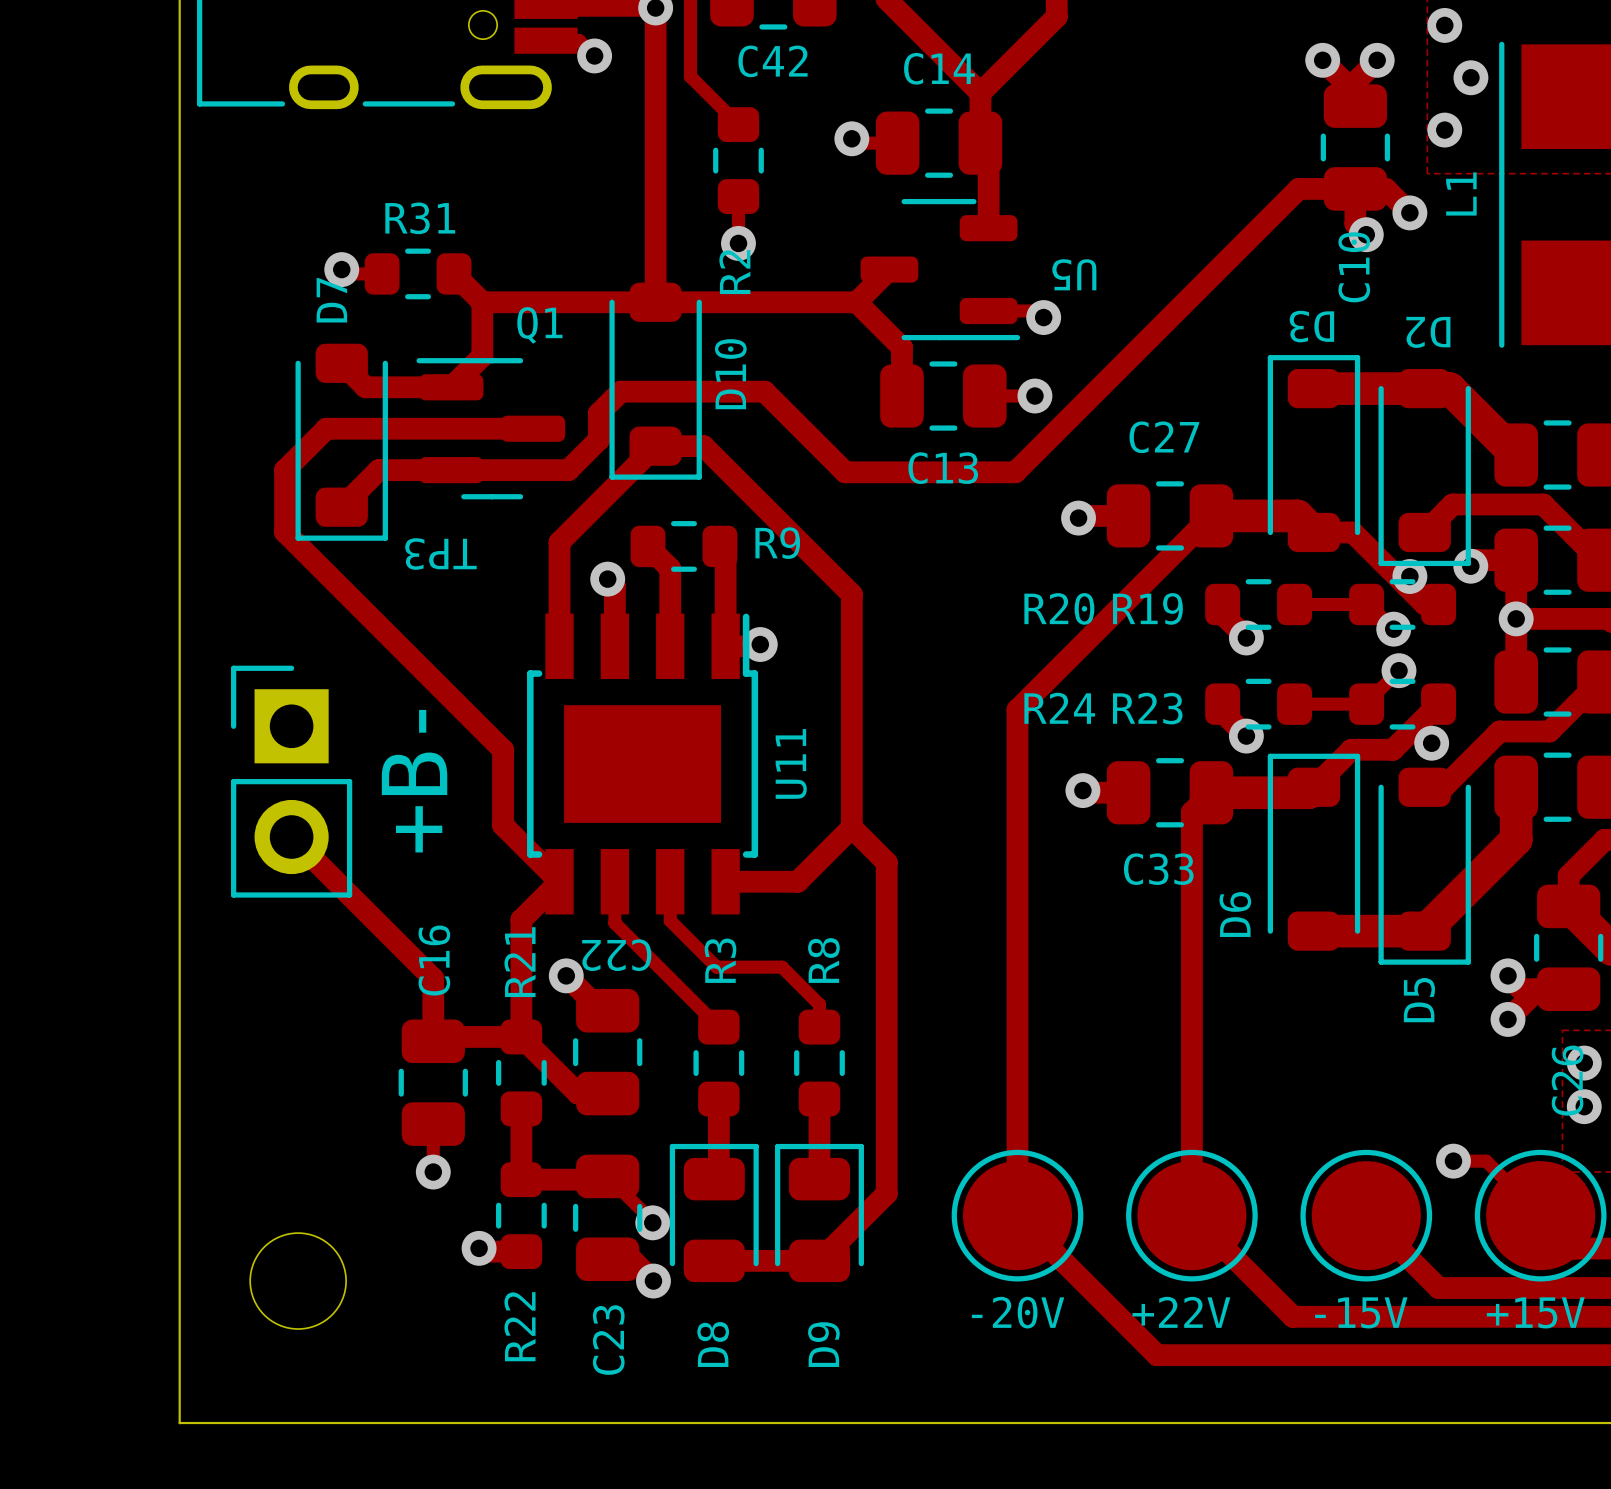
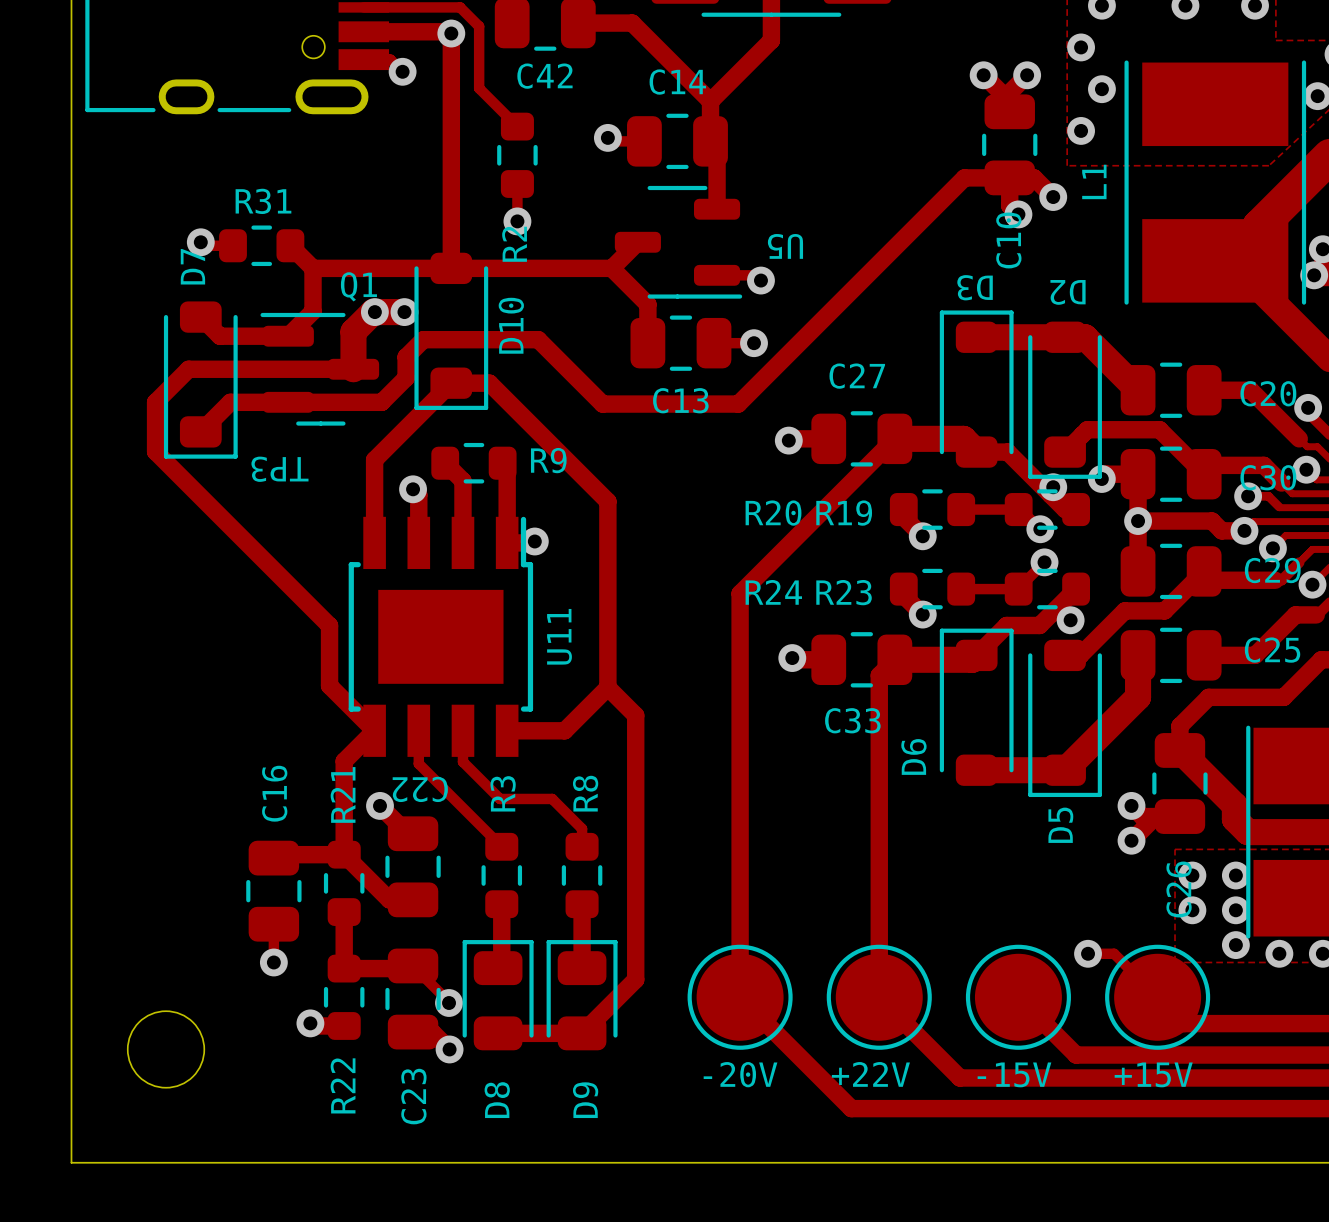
via: none -> (374, 312)
track: none -> (404, 312) (373, 312) (353, 331) (353, 369)
via: none -> (404, 312)
part: (291, 781) -> none
text: +B- (414, 781) -> none
track: (291, 837) (433, 978) (433, 1041) -> none

